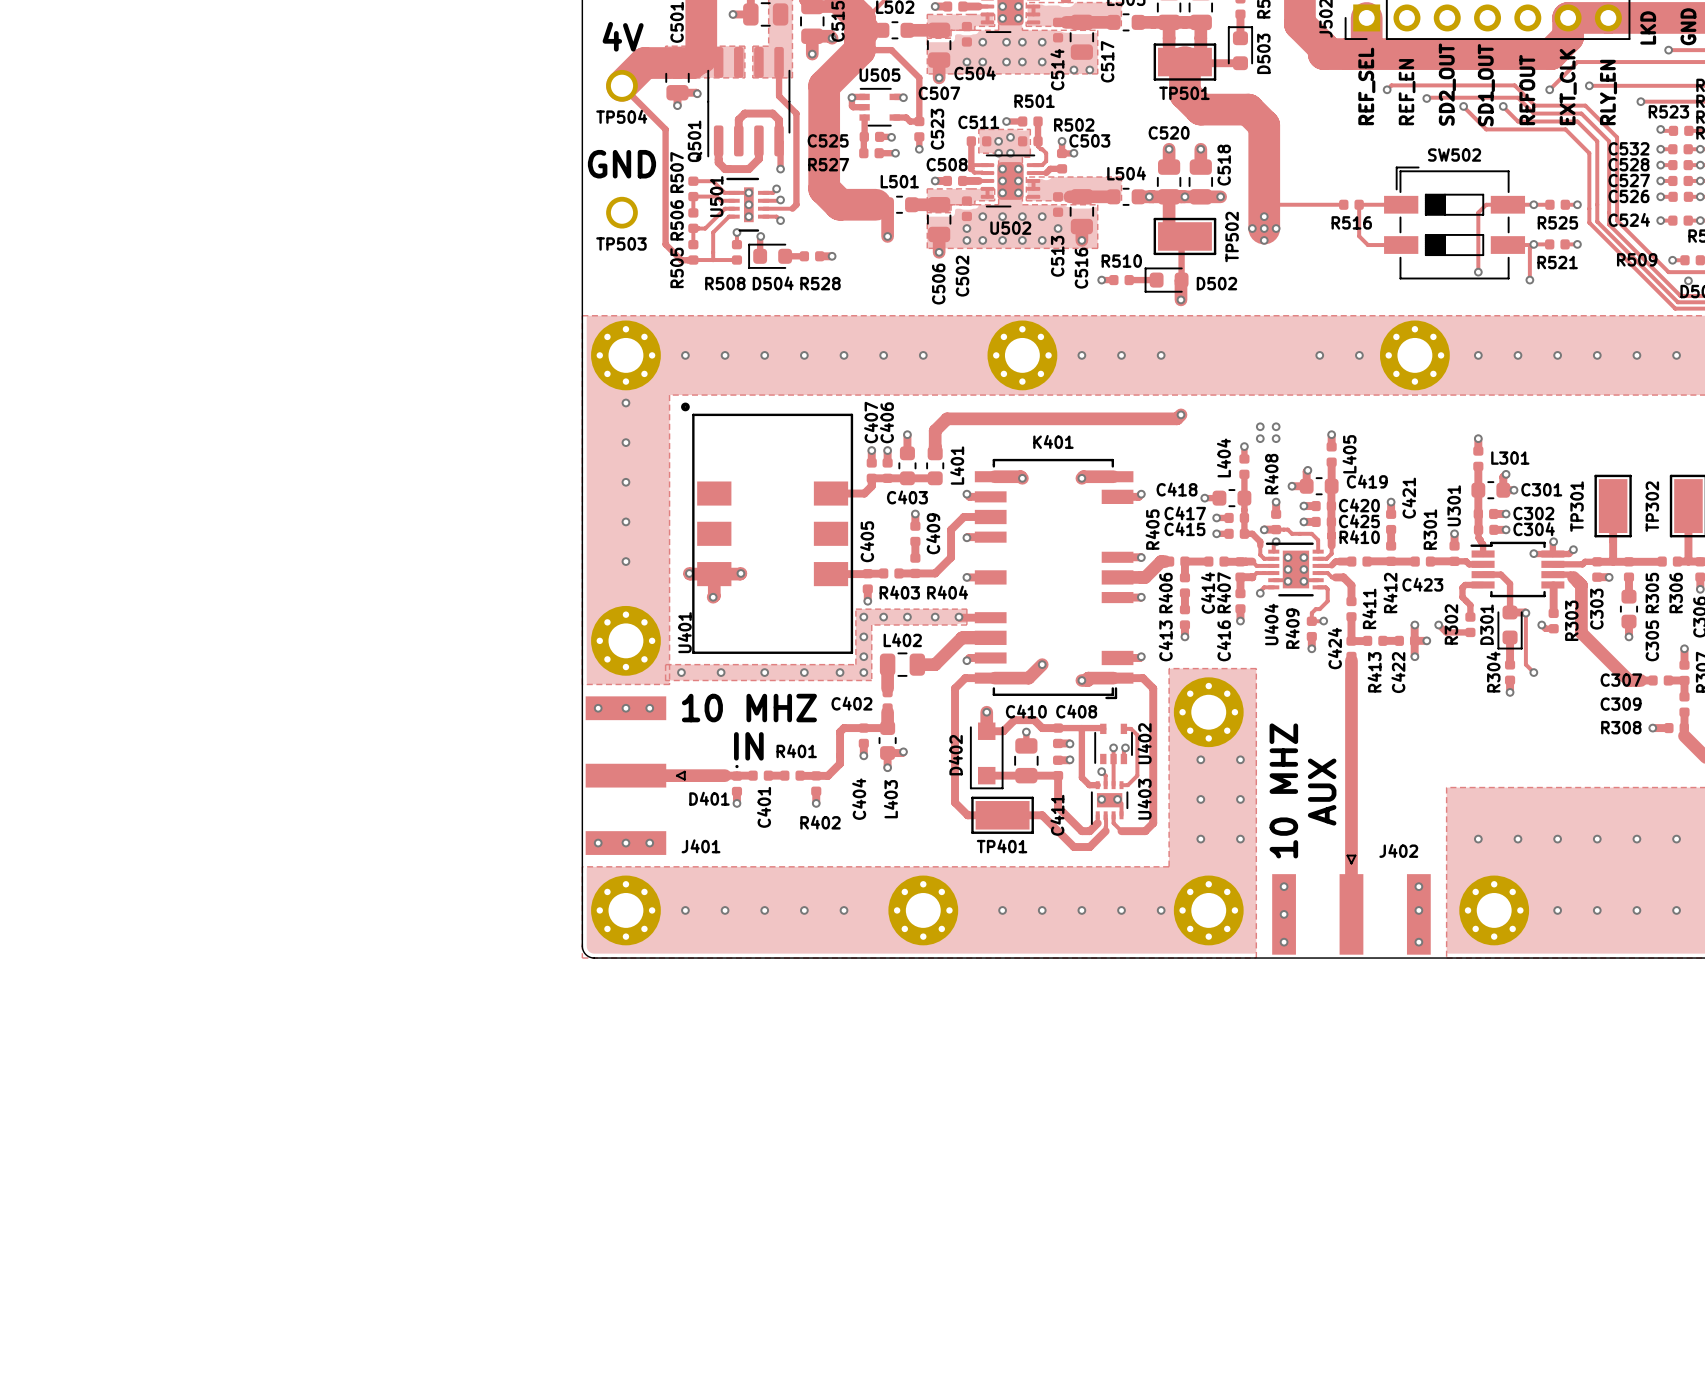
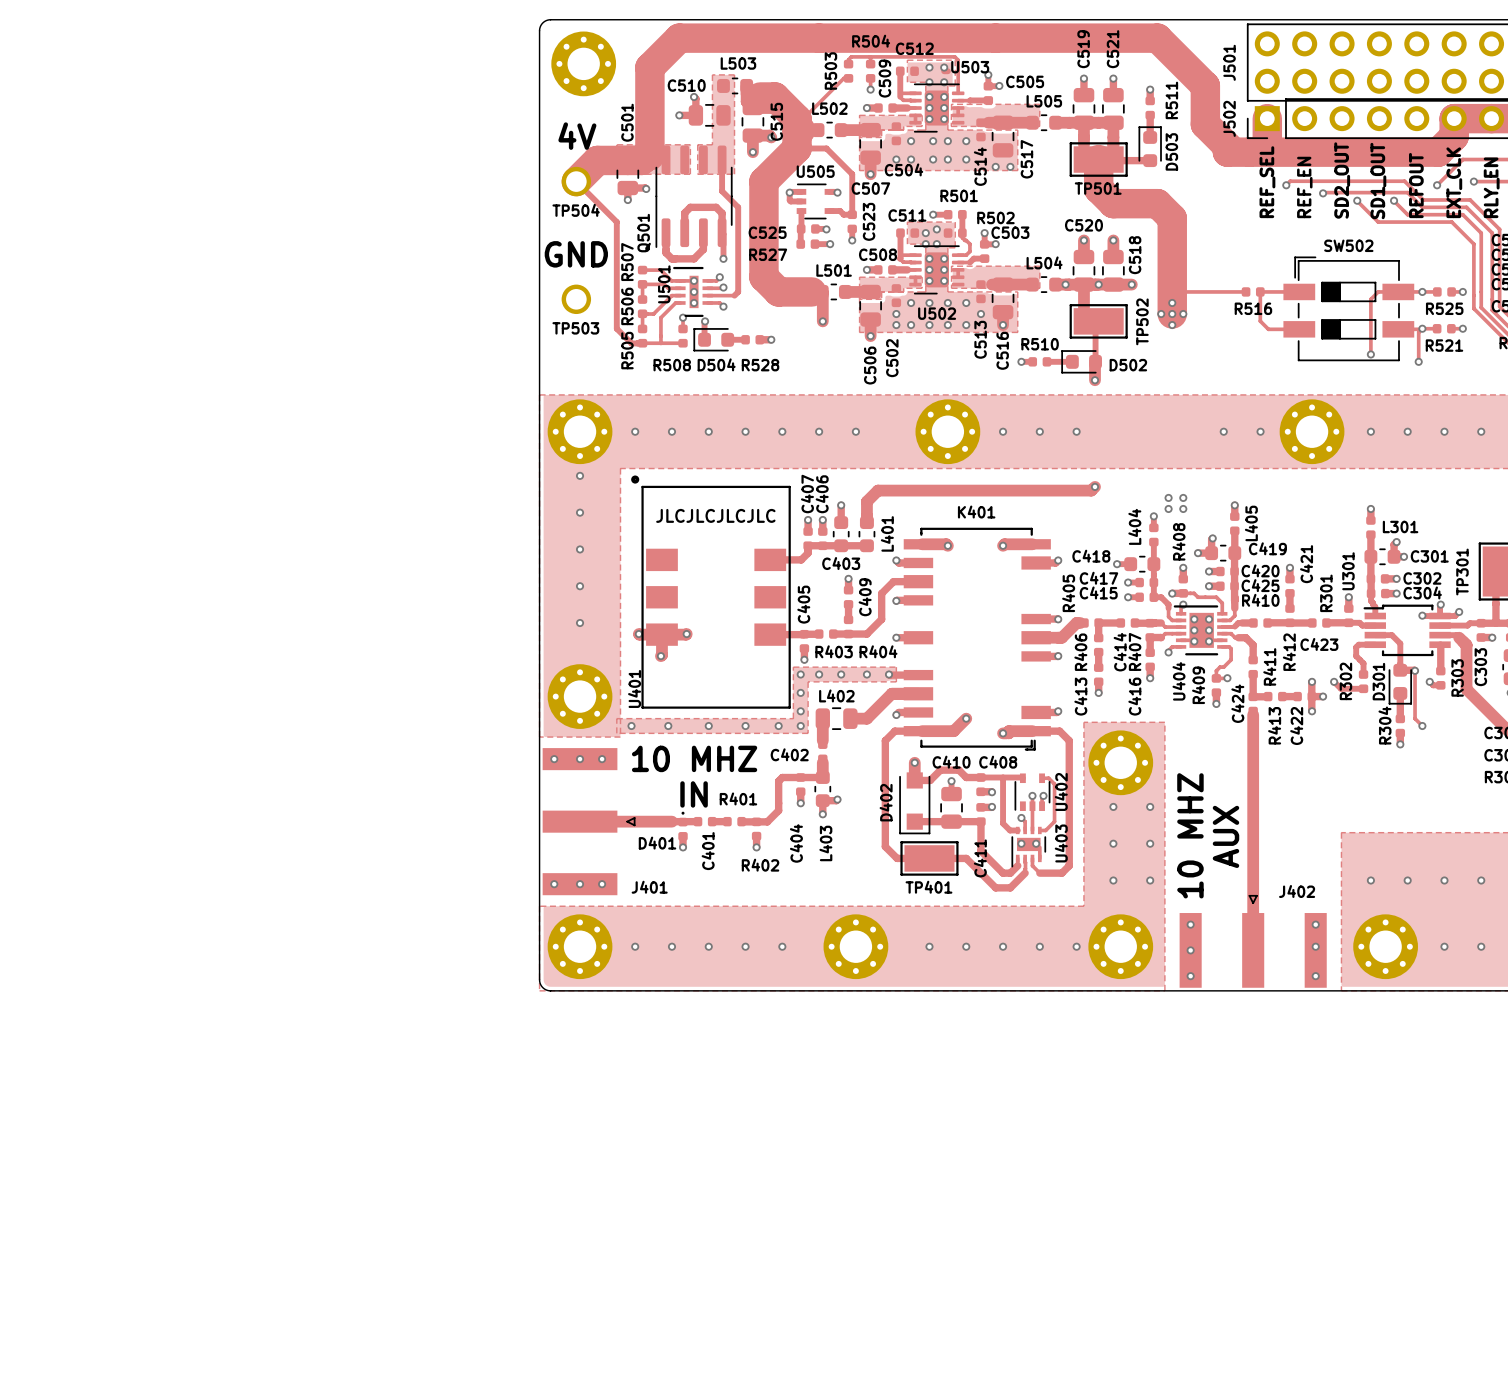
text: none -> JLCJLCJLCJLC (715, 515)

